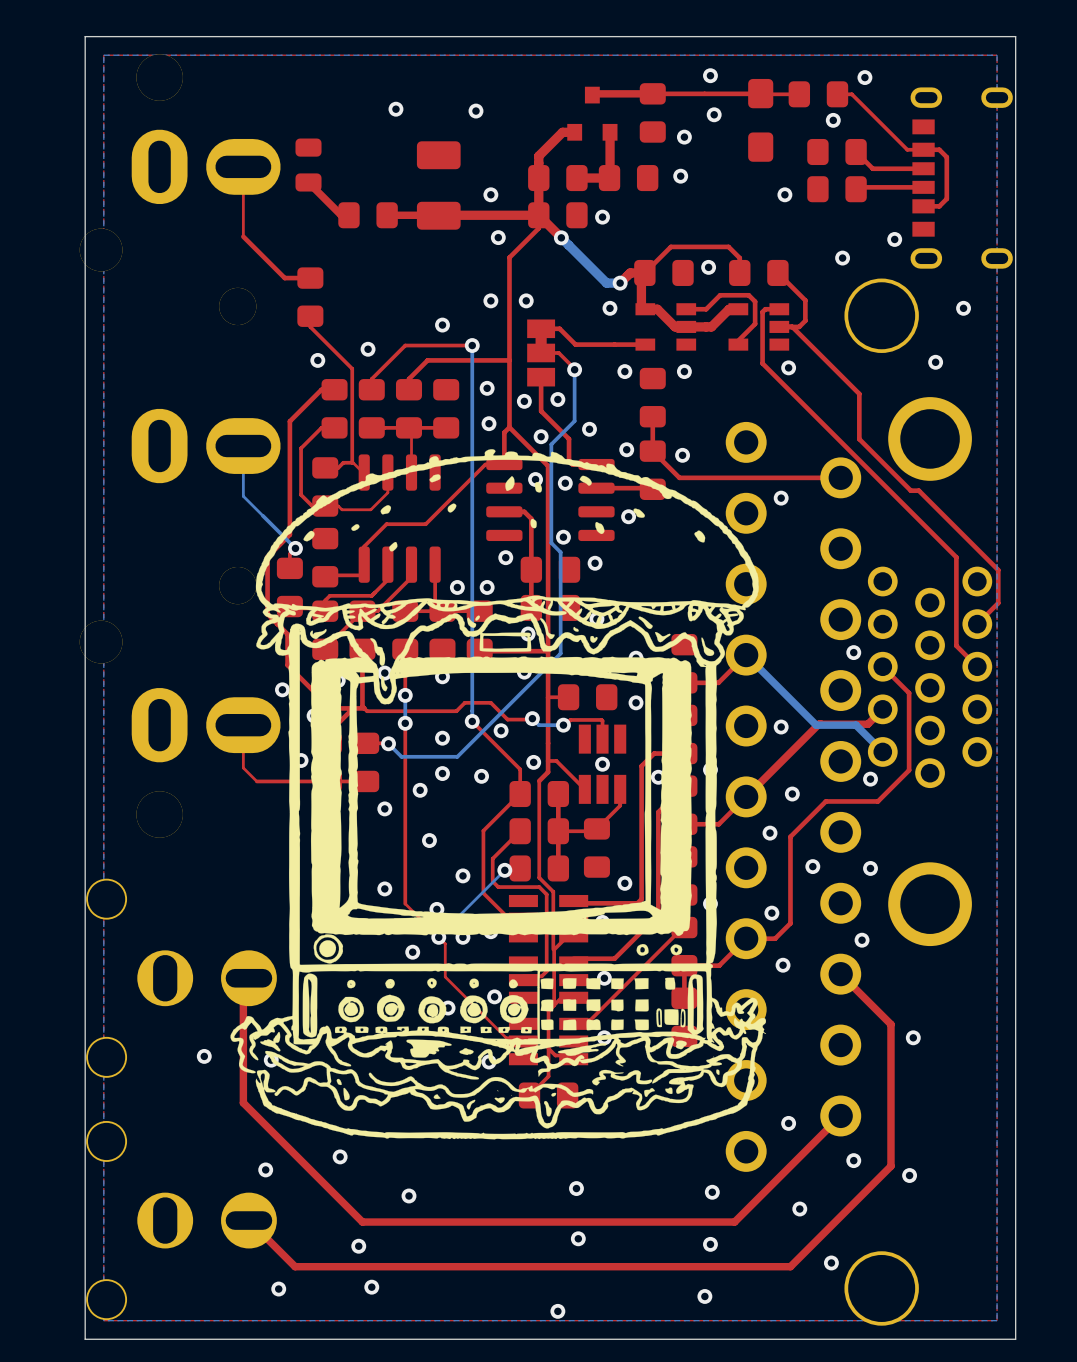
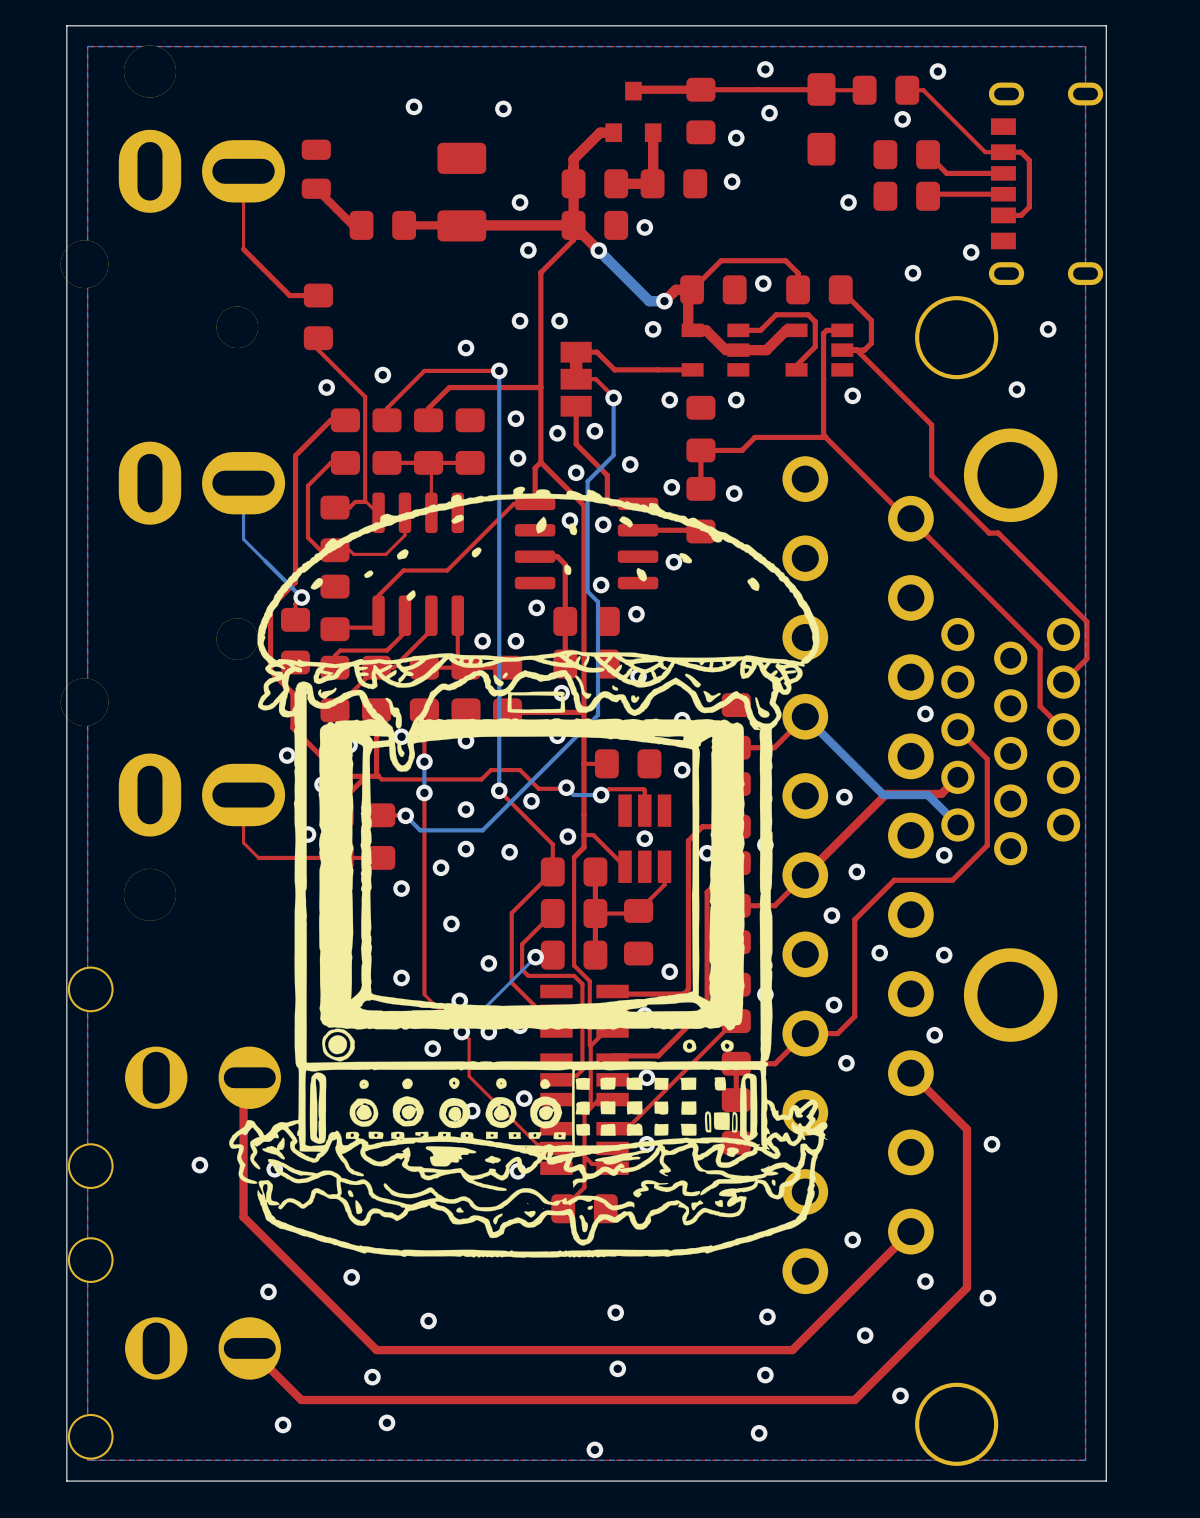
top track: (762, 363) (956, 557) (956, 594) -> (909, 518) (1040, 648)
top track: none -> (825, 437) (754, 437) (741, 450) (700, 450)
top track: (652, 451) (679, 477) (837, 477) -> (823, 390) (823, 435) (906, 518)
via: (781, 498) -> none

